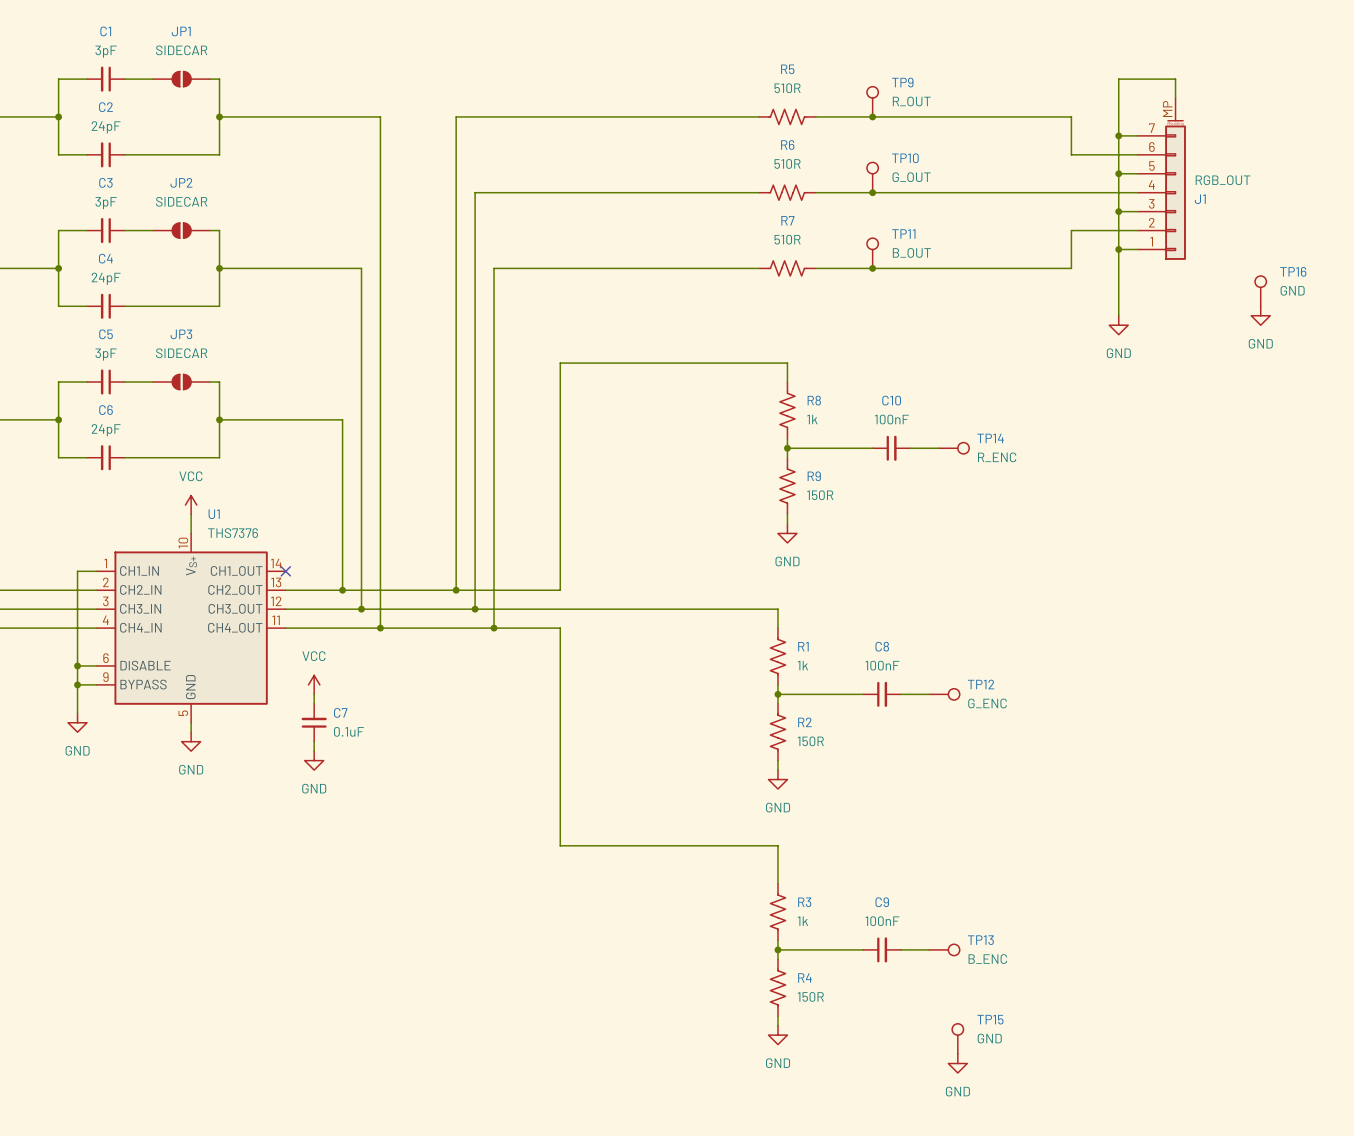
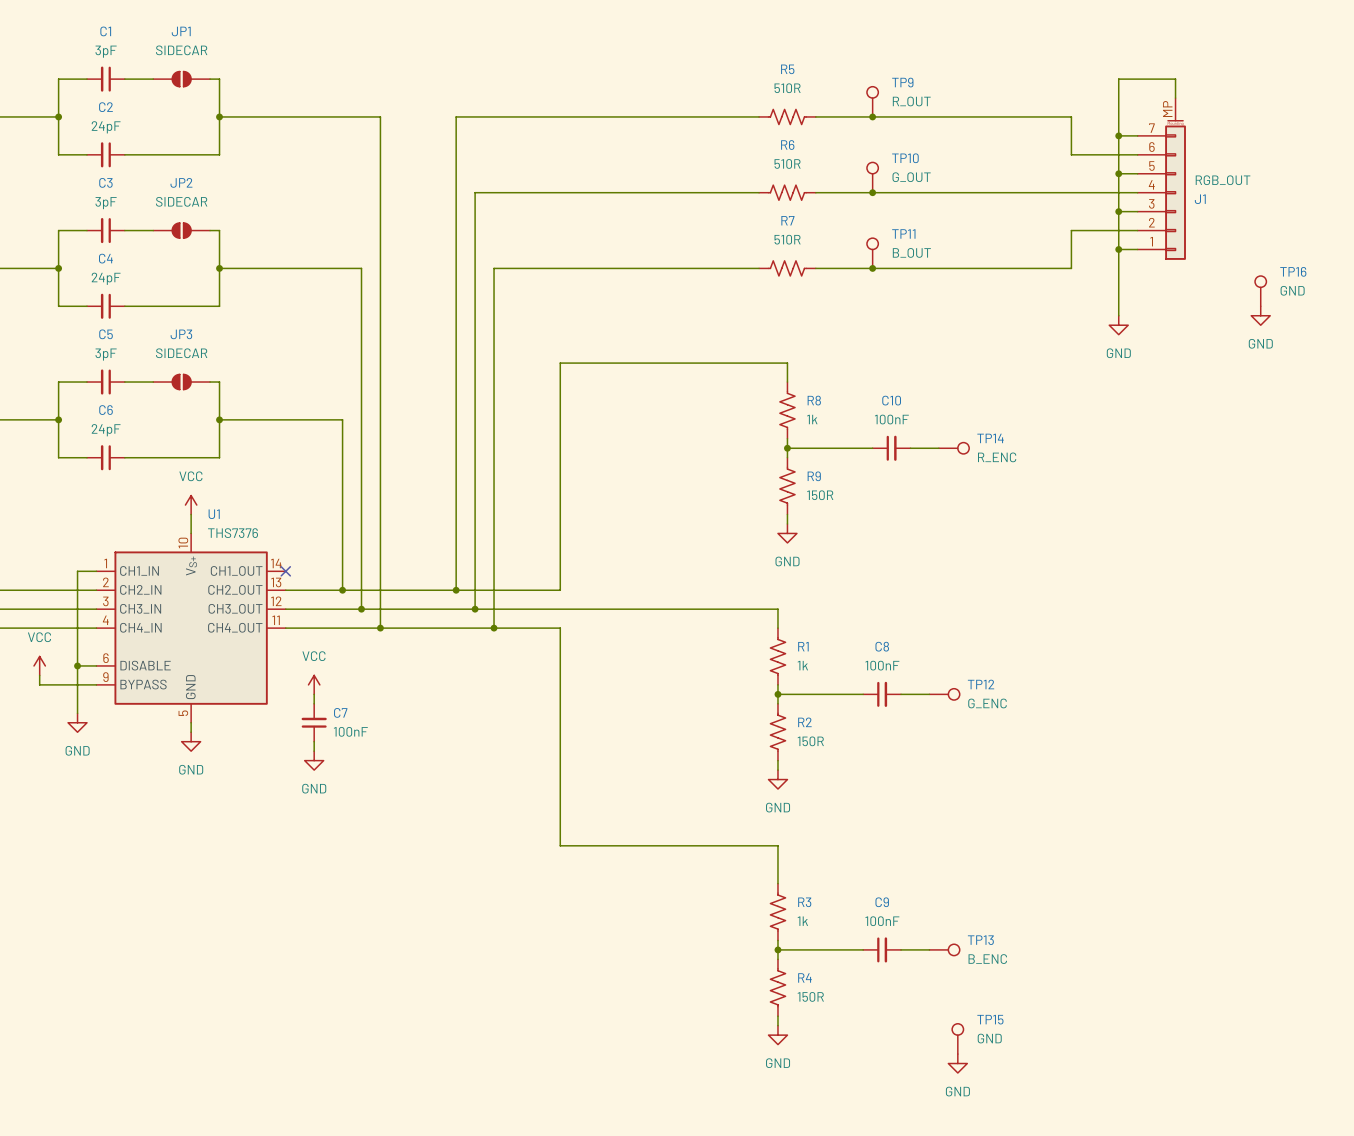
power symbol: none -> VCC (39, 665)
wire: none -> (39, 675) (39, 684) (77, 684)
junction: (77, 684) -> none
C7 value: 0.1uF (348, 731) -> 100nF (350, 731)

